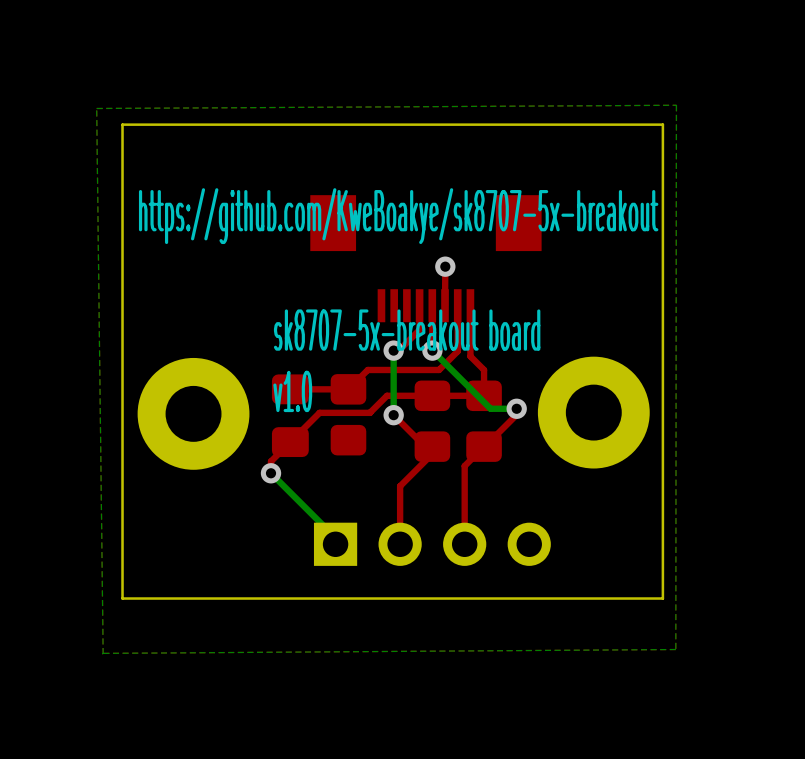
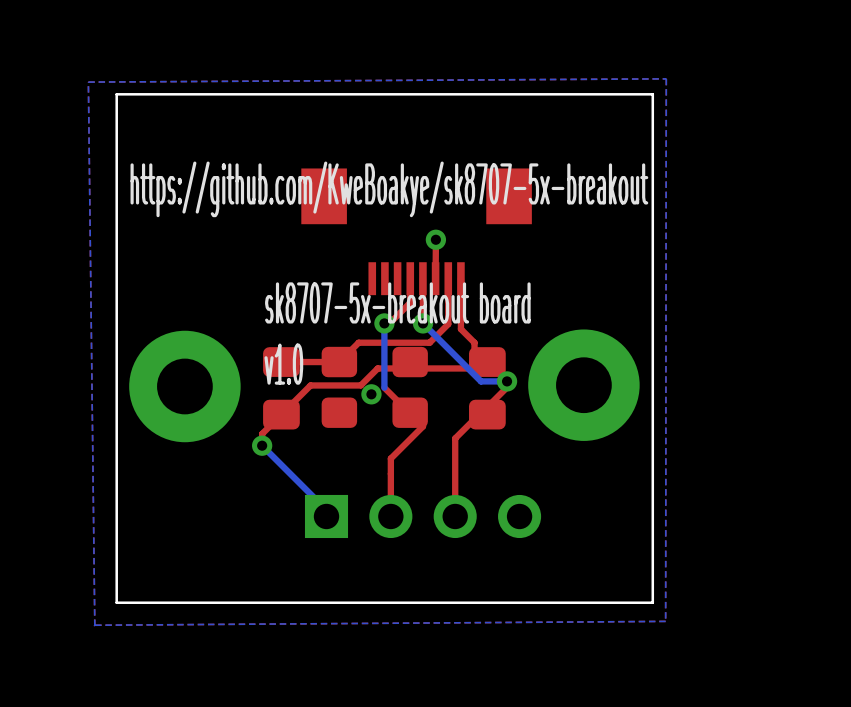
board edge: (662, 124) (122, 124) (122, 598) (662, 598) -> (652, 98) (652, 94) (116, 94) (116, 602) (652, 602) (652, 570)
part footprint: [466, 380, 502, 462] -> [469, 347, 506, 430]
via position: (393, 415) -> (371, 394)
part position: (432, 421) -> (410, 387)

